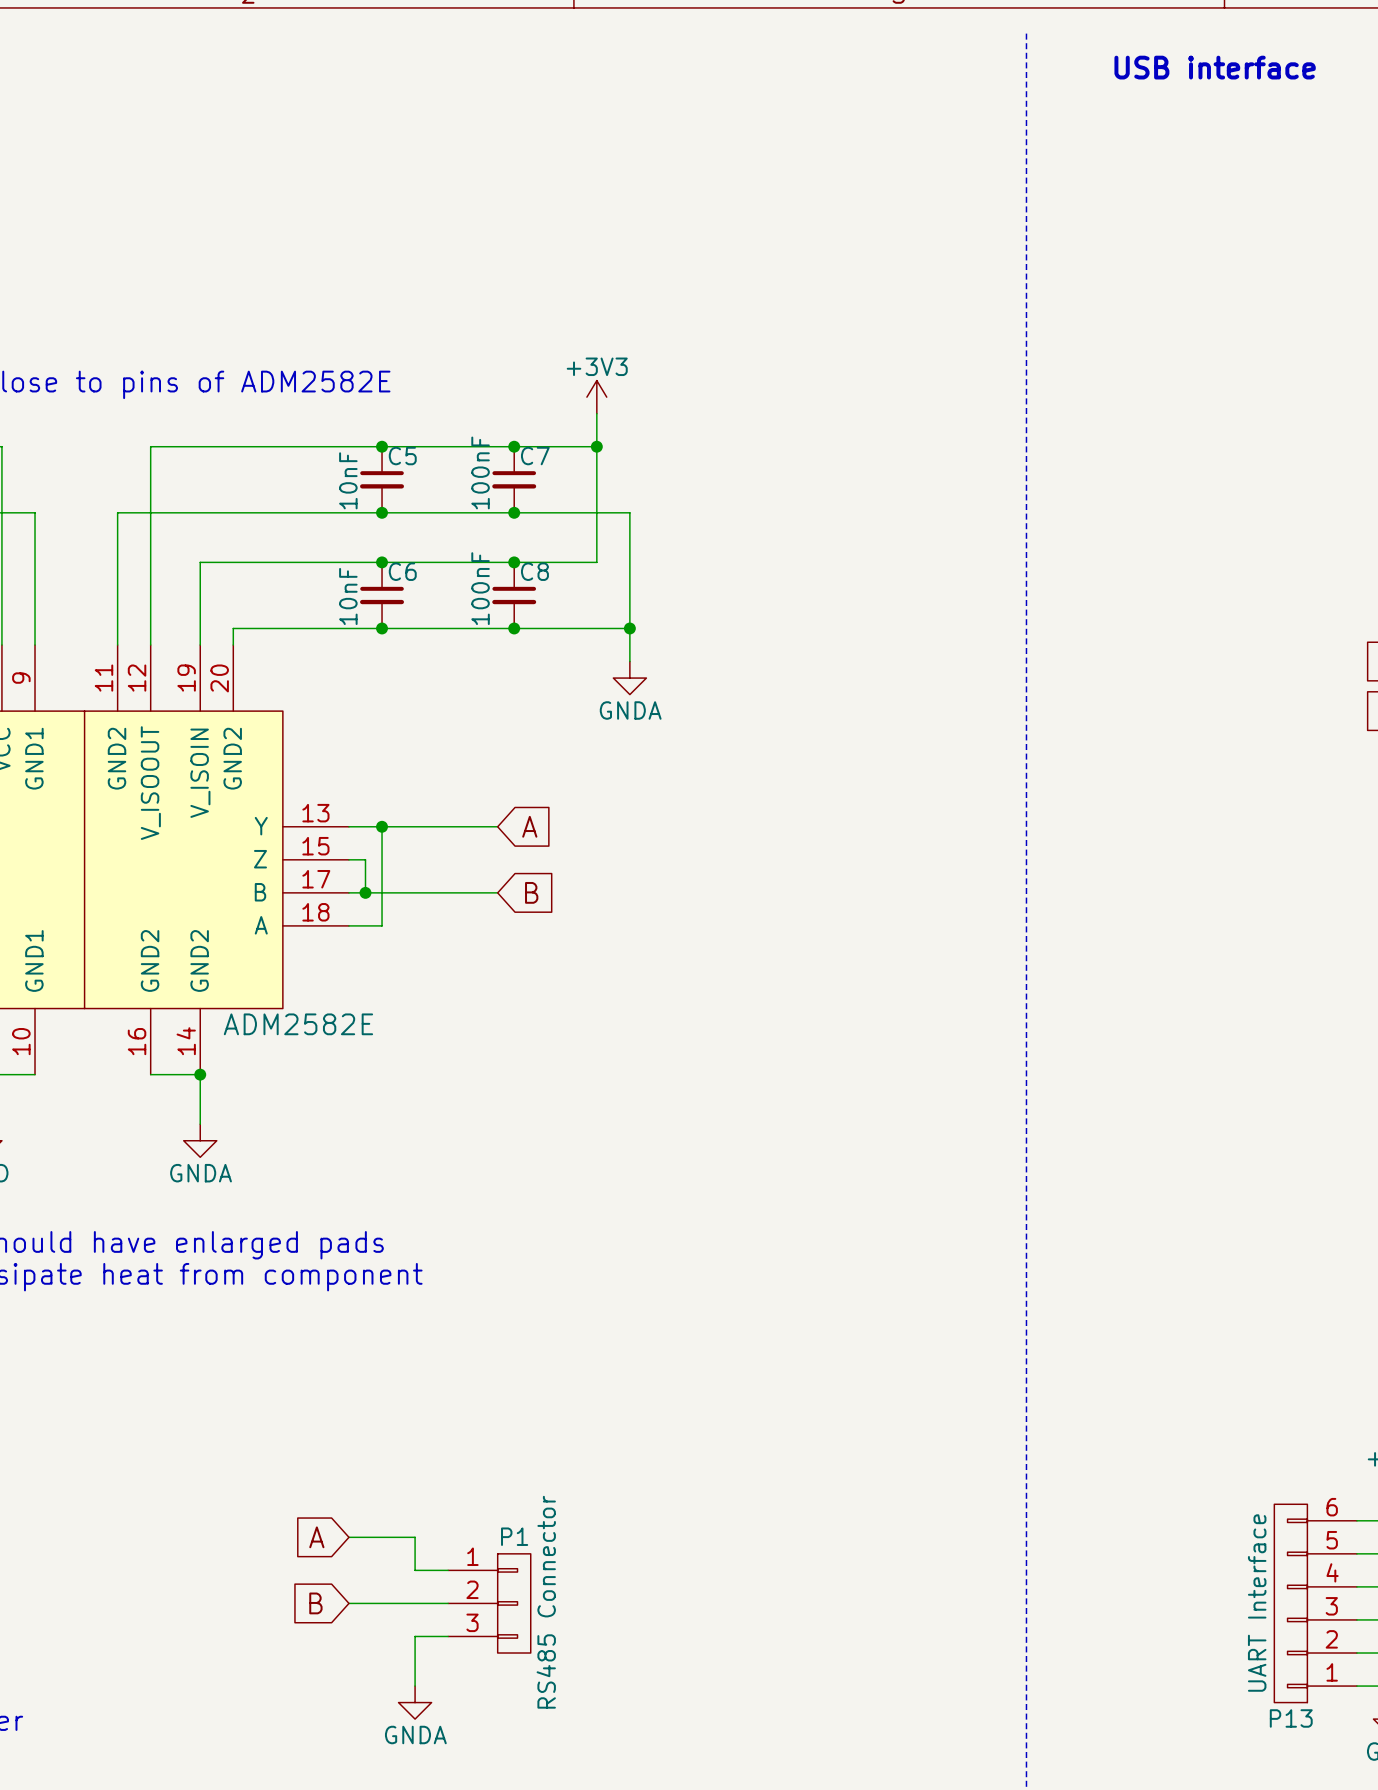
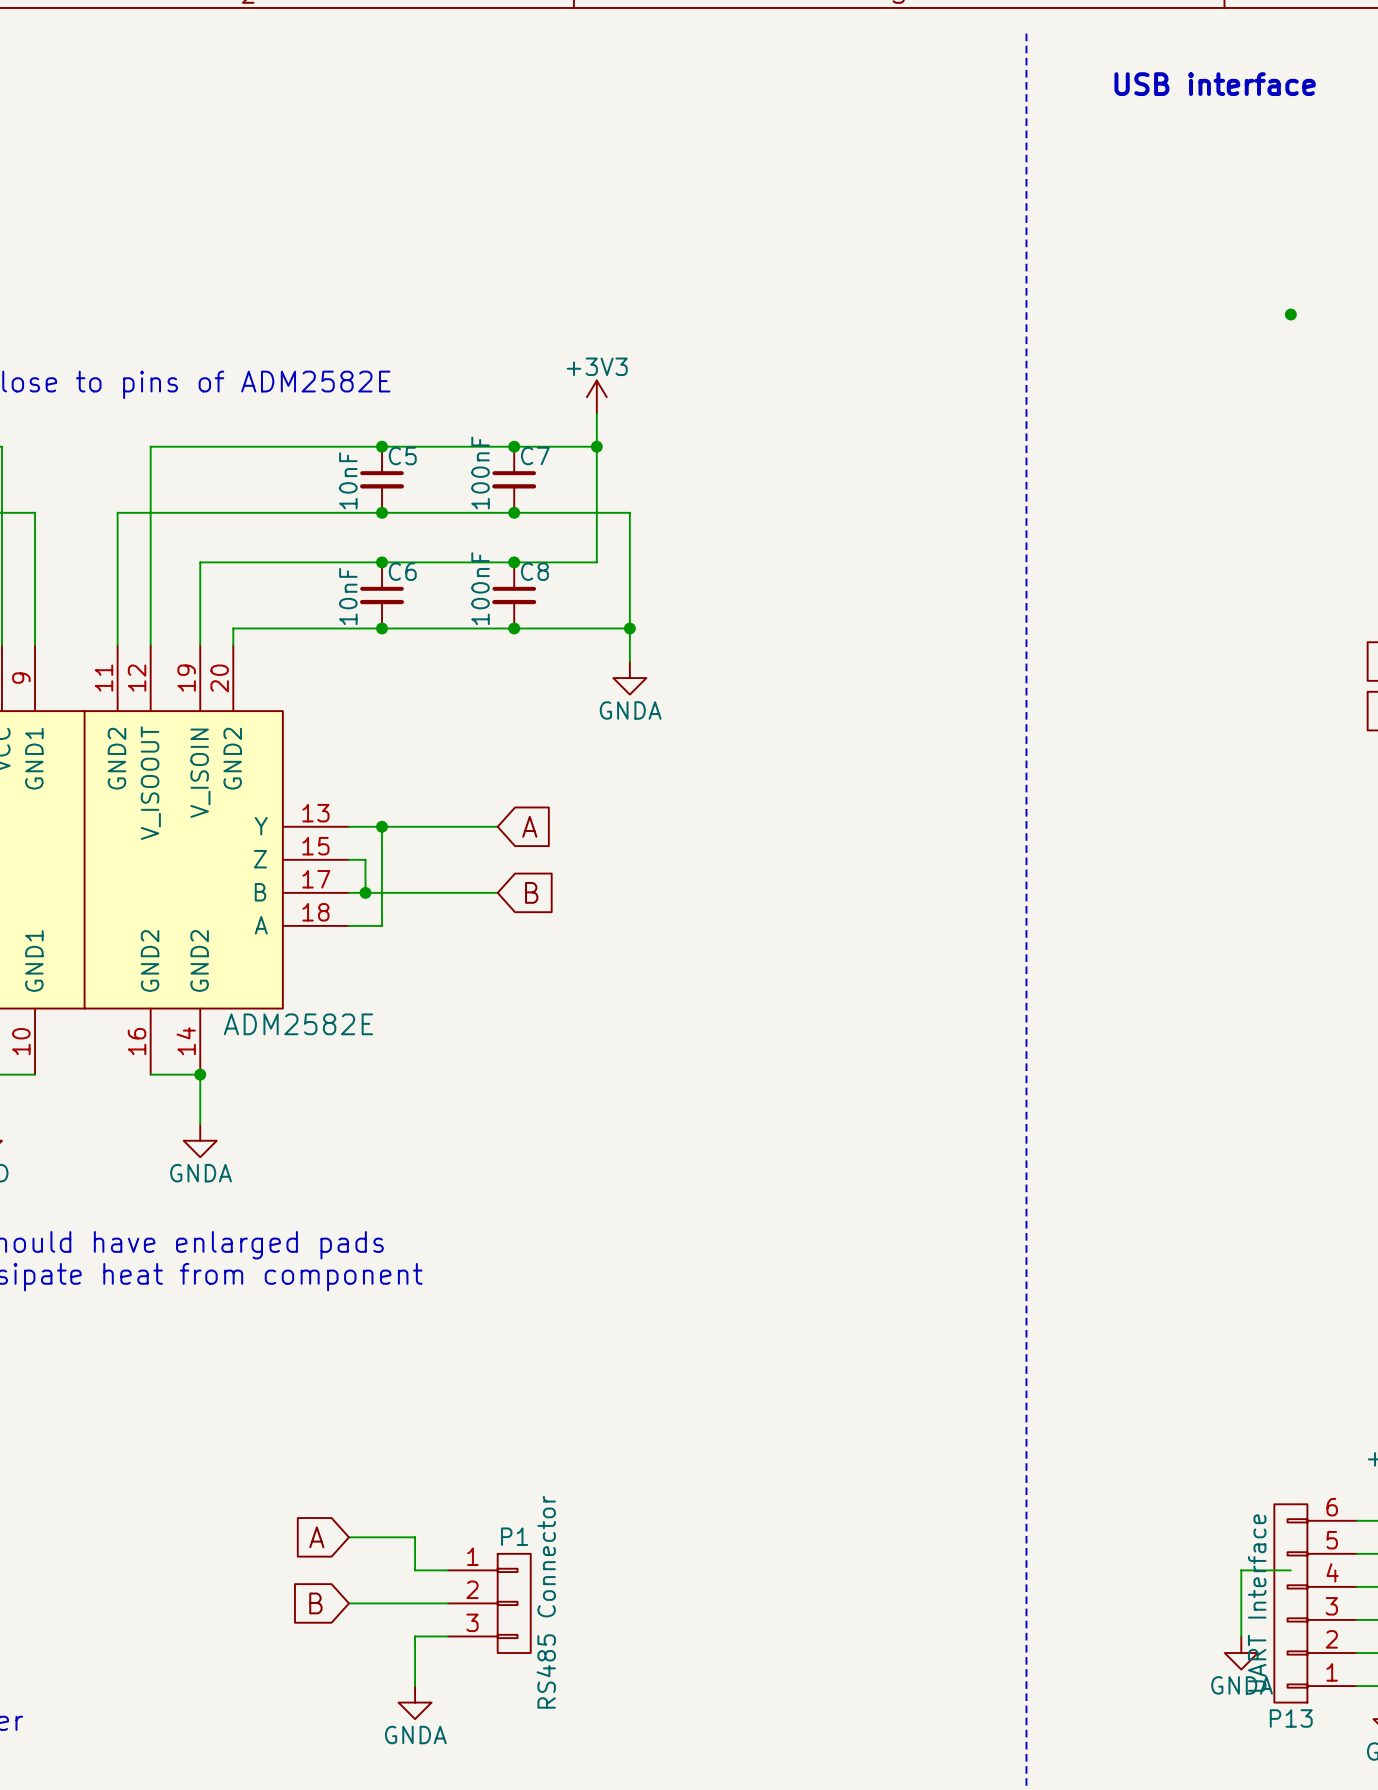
text position: USB interface (1215, 67) -> USB interface (1215, 84)
junction: none -> (1290, 314)
wire: none -> (1290, 1570) (1241, 1570) (1241, 1636)
power symbol: none -> GNDA (1241, 1653)

